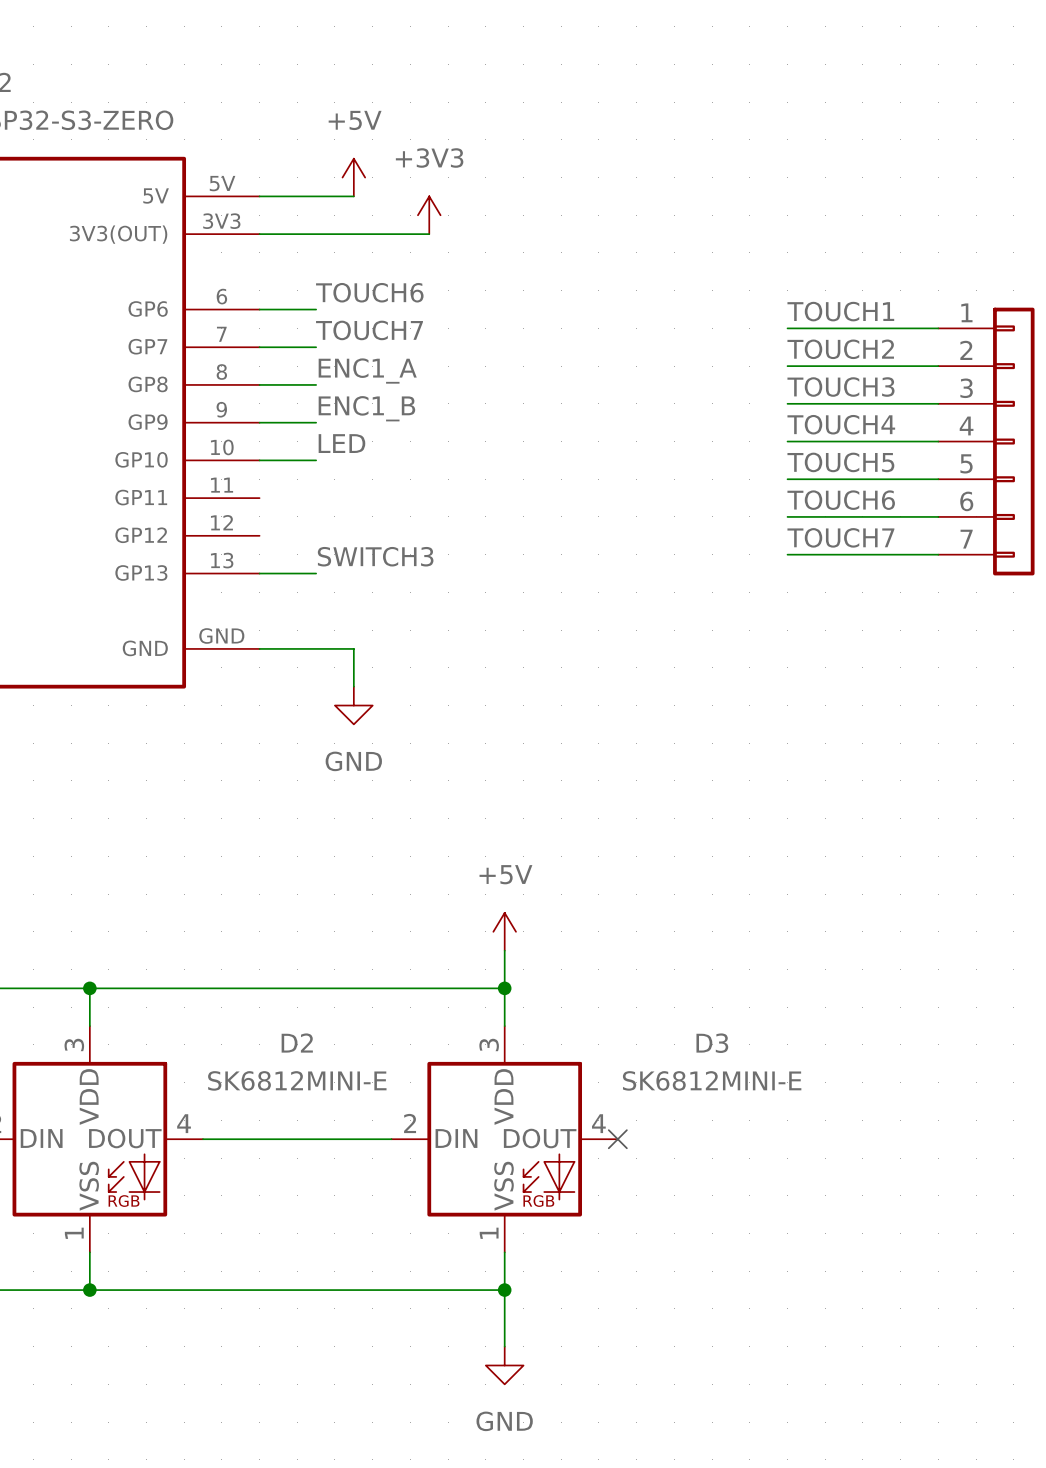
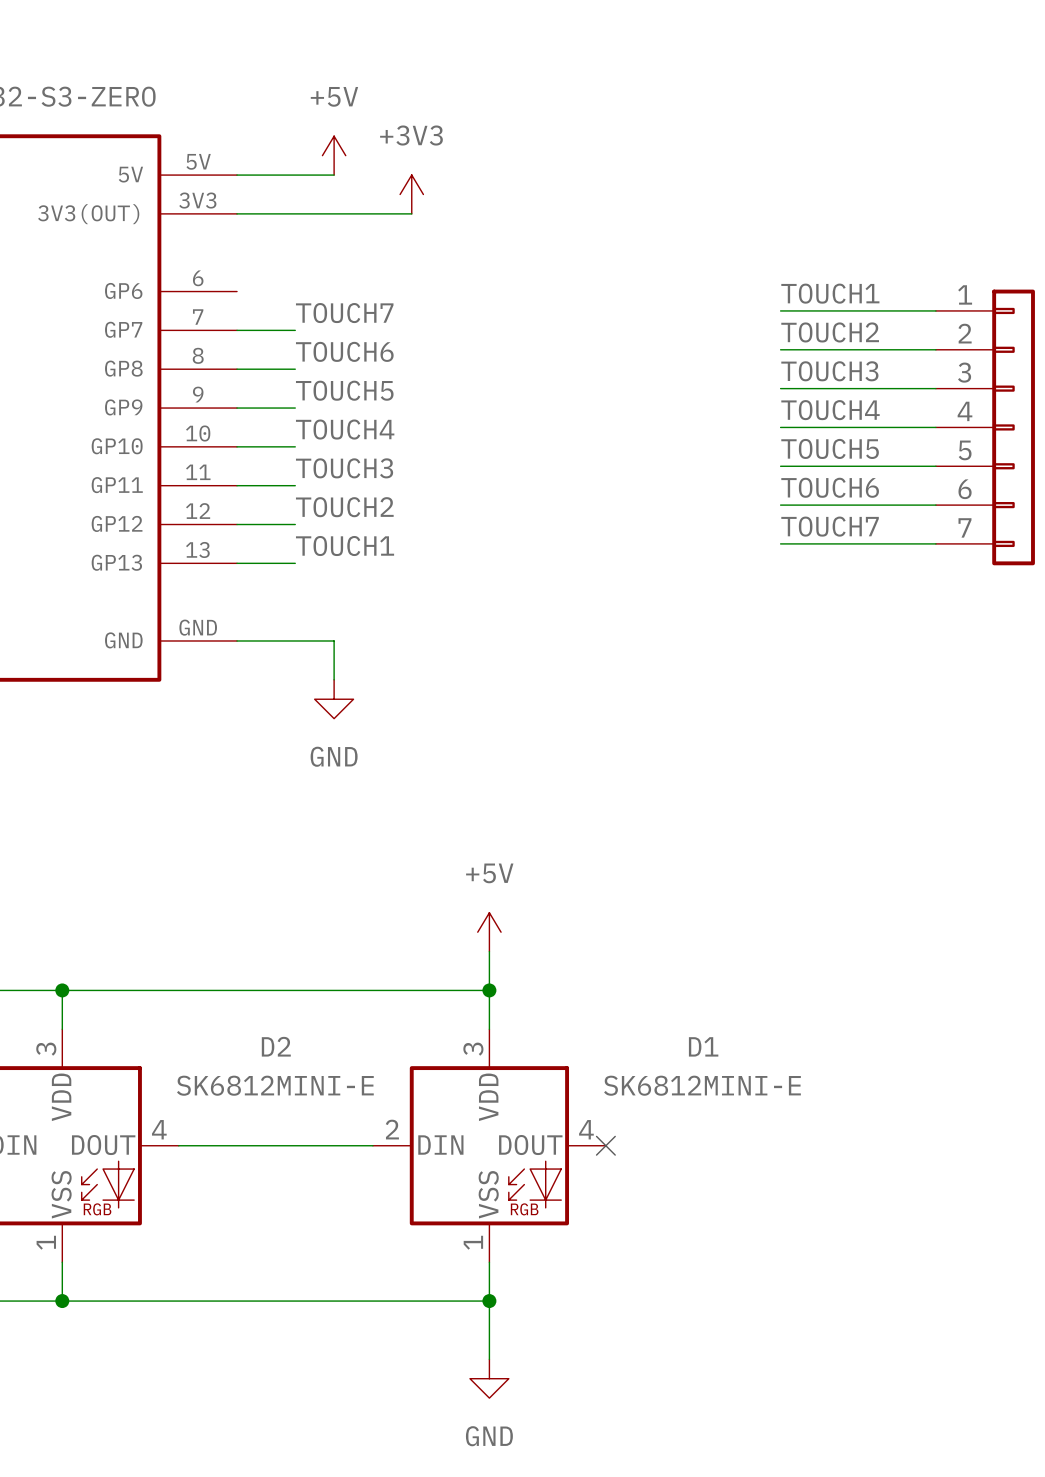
label: TOUCH6 (369, 292) -> none
wire: (259, 309) (316, 309) -> (237, 485) (295, 485)
label: ENC1_A (367, 371) -> TOUCH6 (344, 351)
label: ENC1_B (366, 408) -> TOUCH5 (344, 390)
label: LED (341, 443) -> TOUCH4 (345, 429)
label: none -> TOUCH3 (344, 468)
label: none -> TOUCH2 (344, 507)
wire: none -> (237, 524) (295, 524)
label: SWITCH3 (375, 556) -> TOUCH1 (345, 546)
D3 name: D3 (712, 1043) -> D1 (703, 1046)

